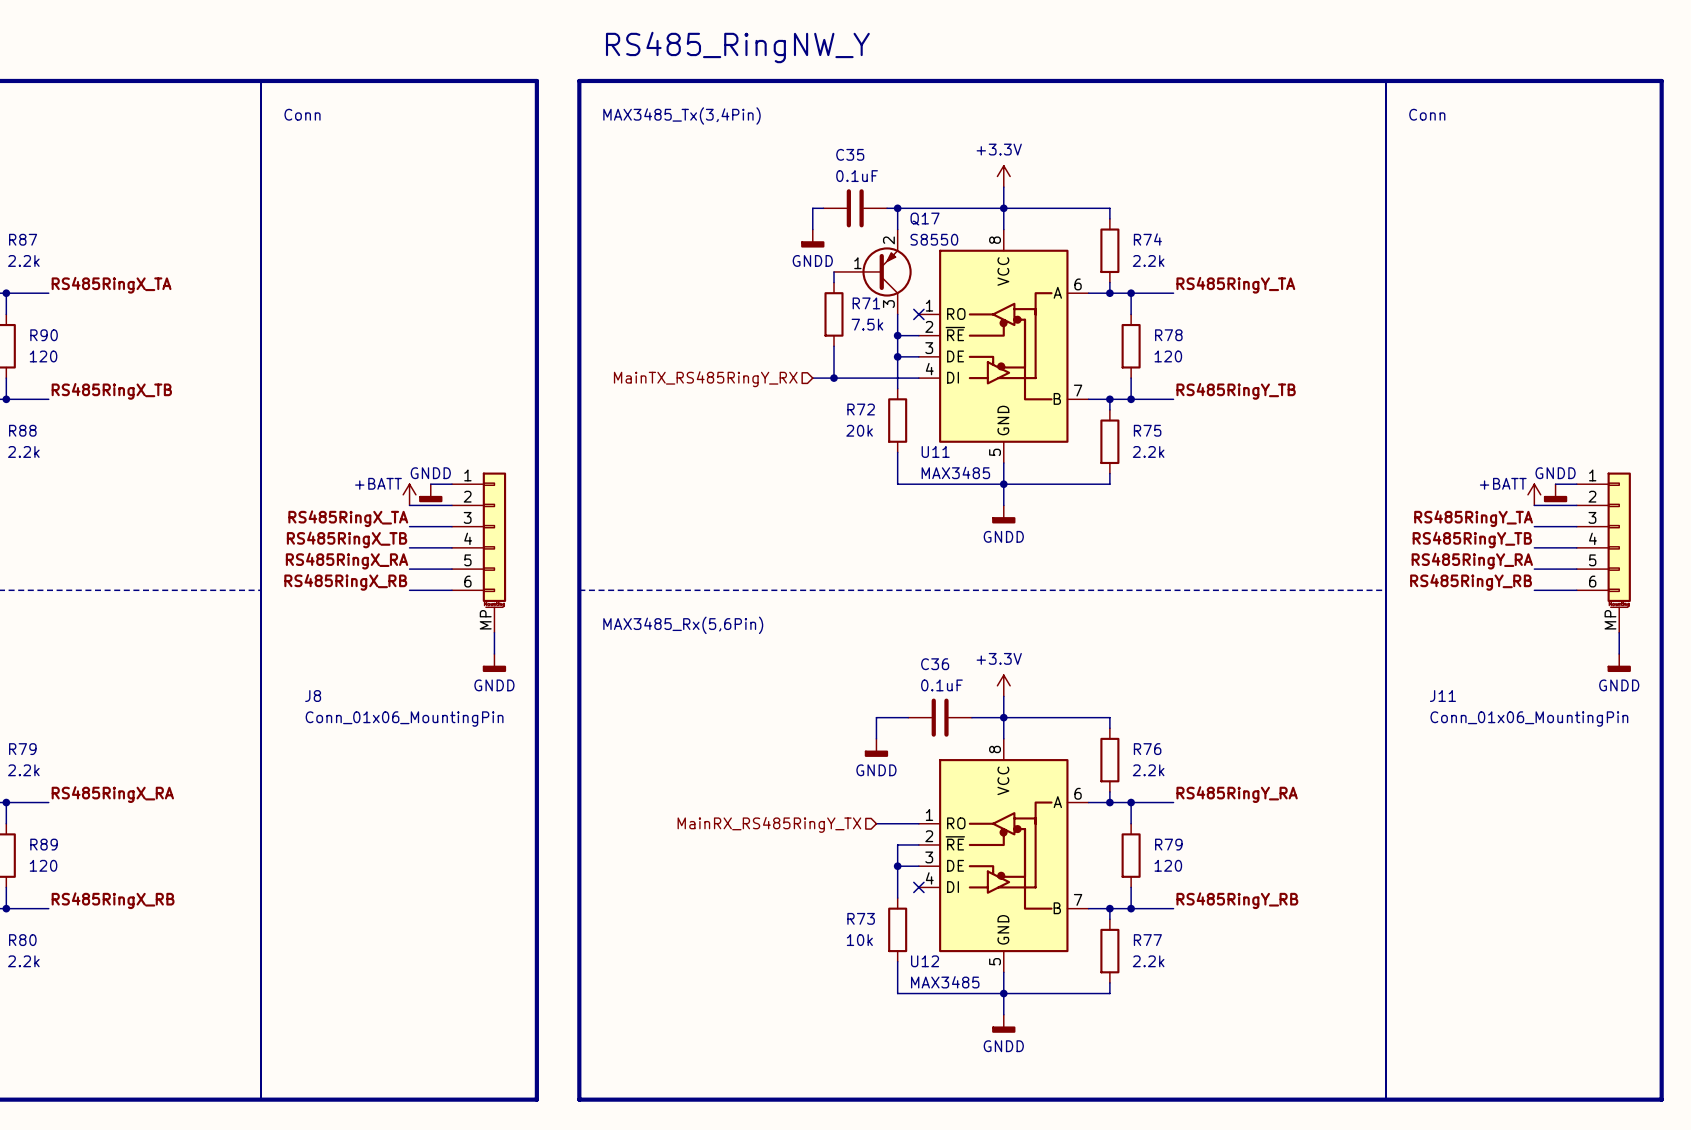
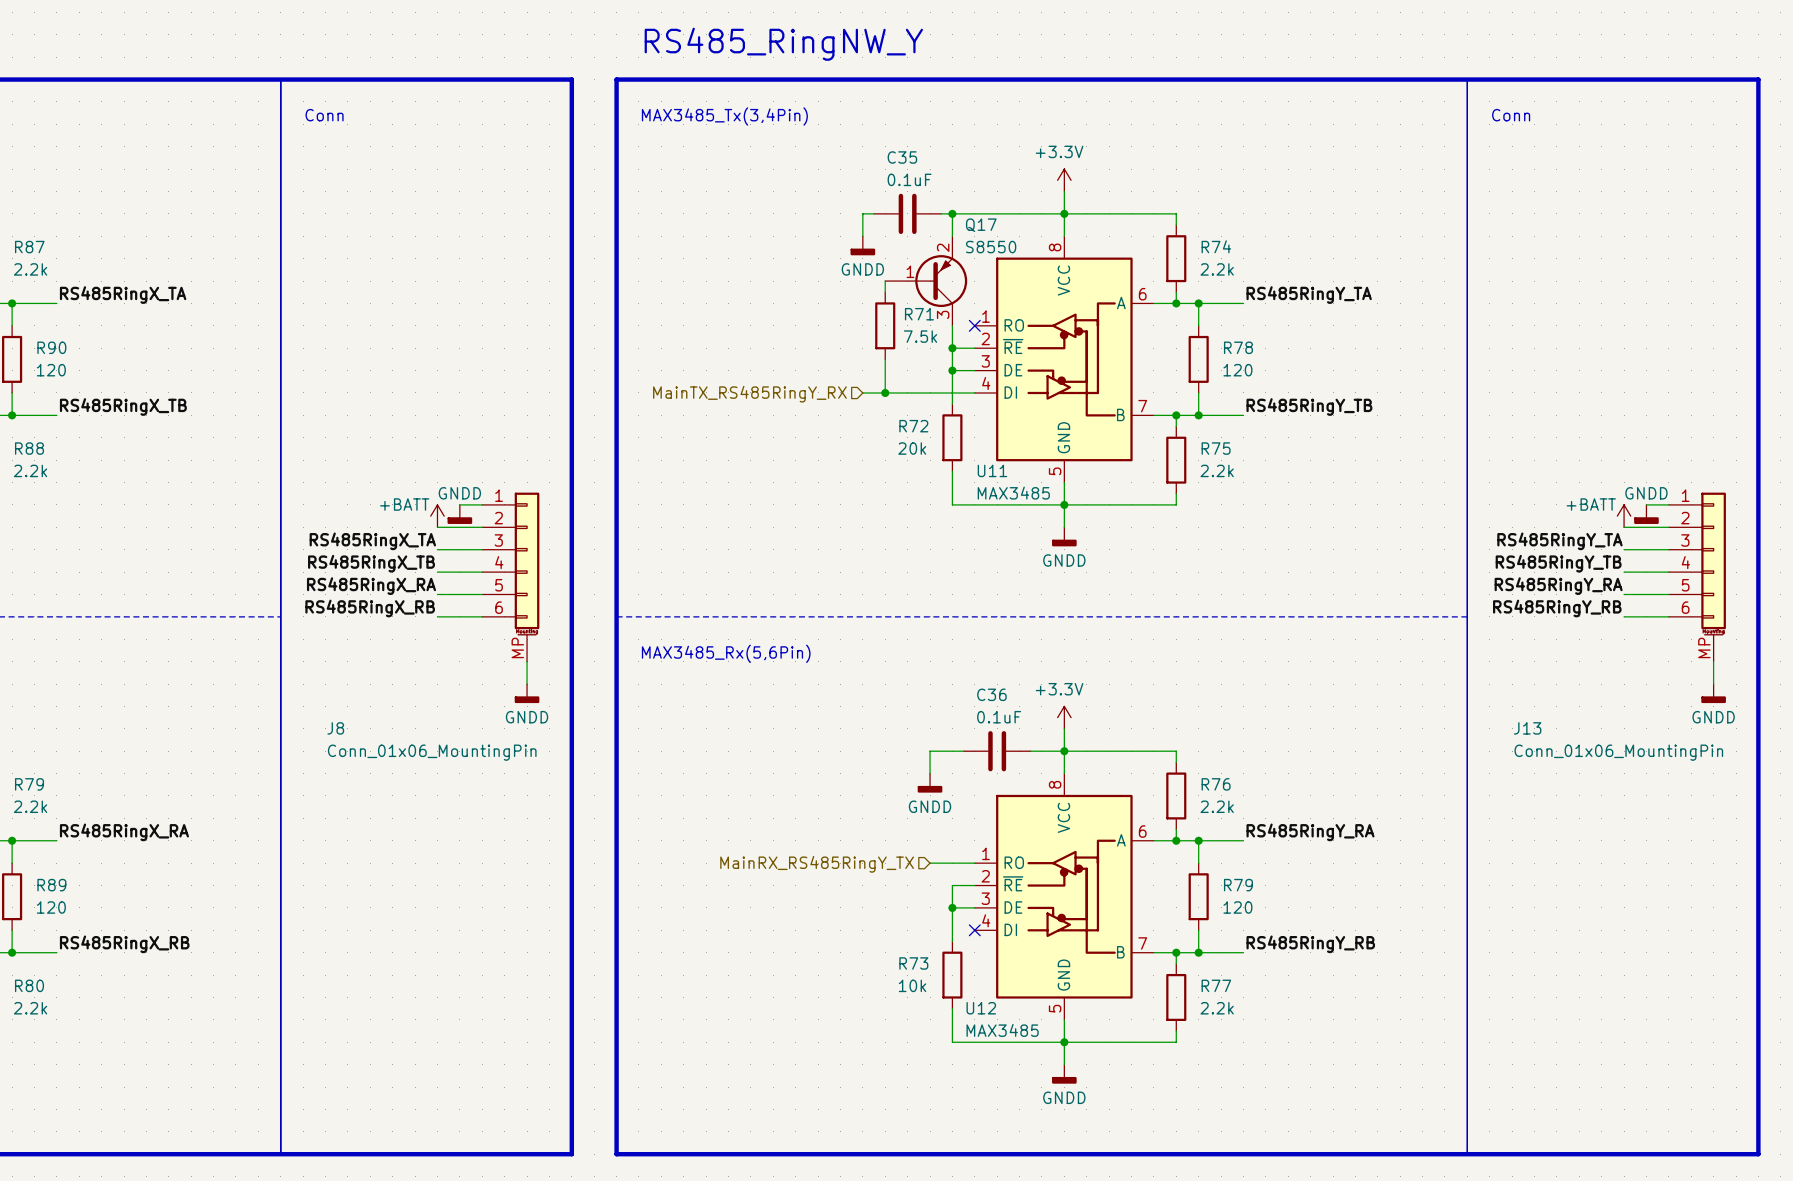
J11 name: J11 (1442, 696) -> J13 (1527, 728)

